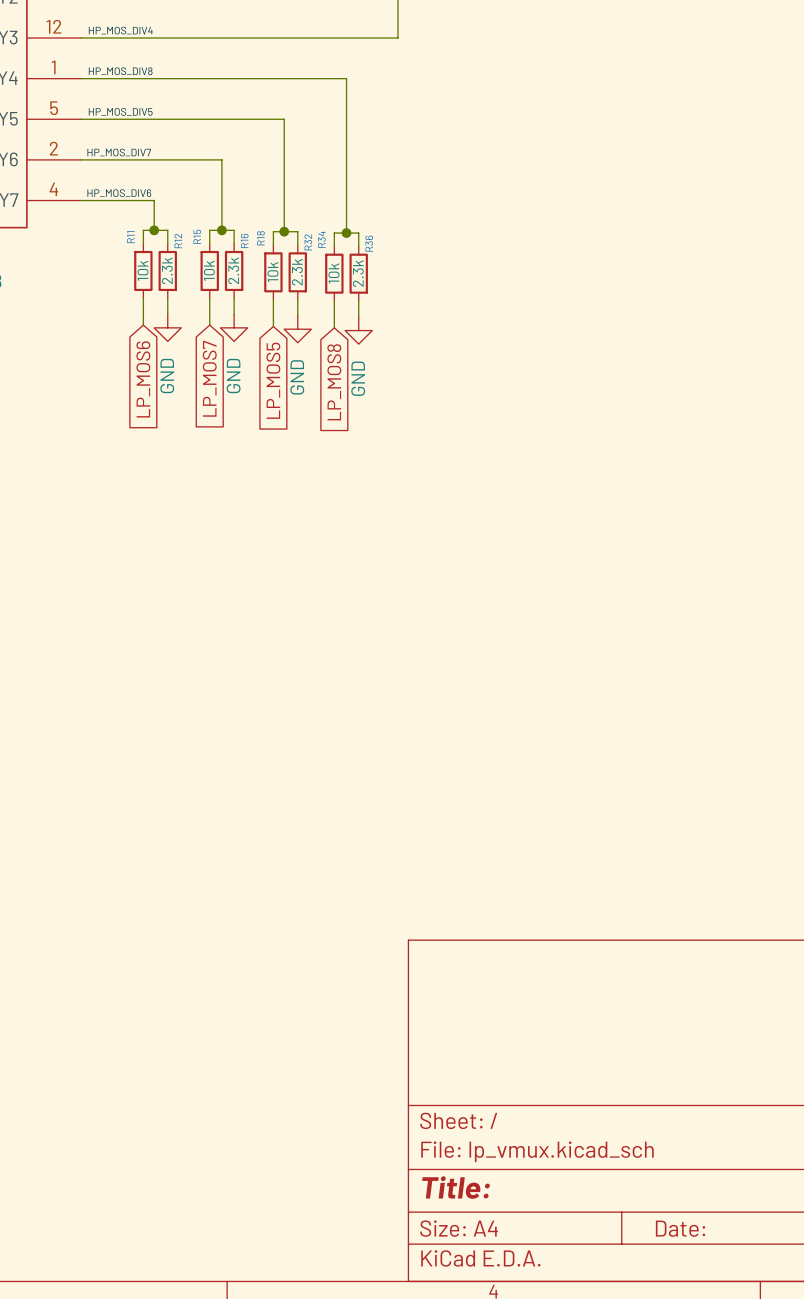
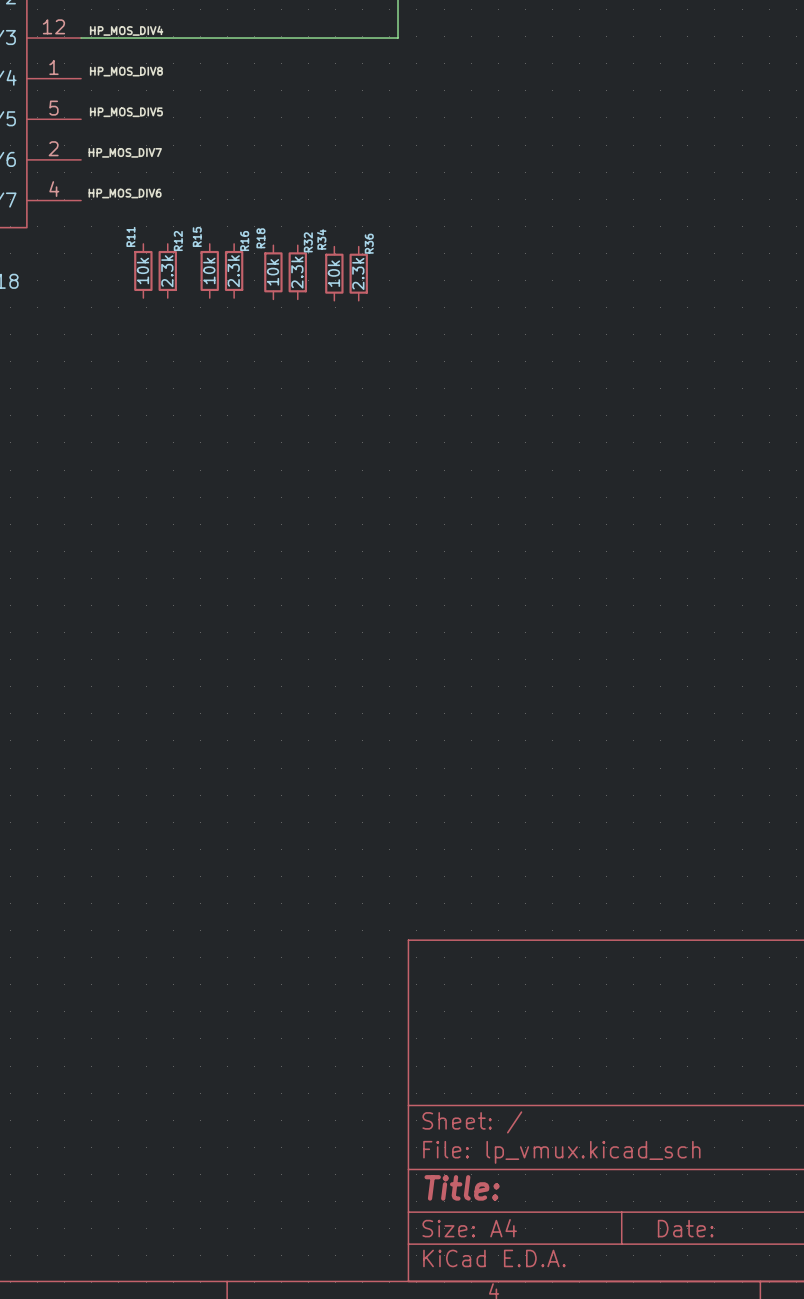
wire: (81, 78) (346, 78) (346, 233) -> none
wire: (81, 119) (284, 119) (284, 231) -> none
wire: (81, 159) (221, 159) (221, 230) -> none
wire: (81, 200) (154, 200) (154, 230) -> none
junction: (154, 230) -> none
junction: (221, 230) -> none
junction: (284, 231) -> none
junction: (346, 233) -> none
wire: (143, 243) (143, 230) (167, 230) (167, 243) -> none
wire: (209, 243) (209, 230) (234, 230) (234, 243) -> none
wire: (273, 245) (273, 231) (297, 231) (297, 245) -> none
wire: (334, 246) (334, 233) (358, 233) (358, 246) -> none
wire: (143, 298) (143, 325) -> none
wire: (167, 298) (167, 314) -> none
wire: (209, 298) (209, 325) -> none
wire: (234, 298) (234, 314) -> none
wire: (273, 299) (273, 326) -> none
wire: (297, 299) (297, 315) -> none
wire: (334, 300) (334, 327) -> none
wire: (358, 300) (358, 317) -> none
power symbol: GND (167, 327) -> none
power symbol: GND (234, 327) -> none
power symbol: GND (297, 329) -> none
power symbol: GND (358, 330) -> none
global label: LP_MOS7 (209, 378) -> none
global label: LP_MOS6 (143, 379) -> none
global label: LP_MOS5 (273, 380) -> none
global label: LP_MOS8 (334, 382) -> none

